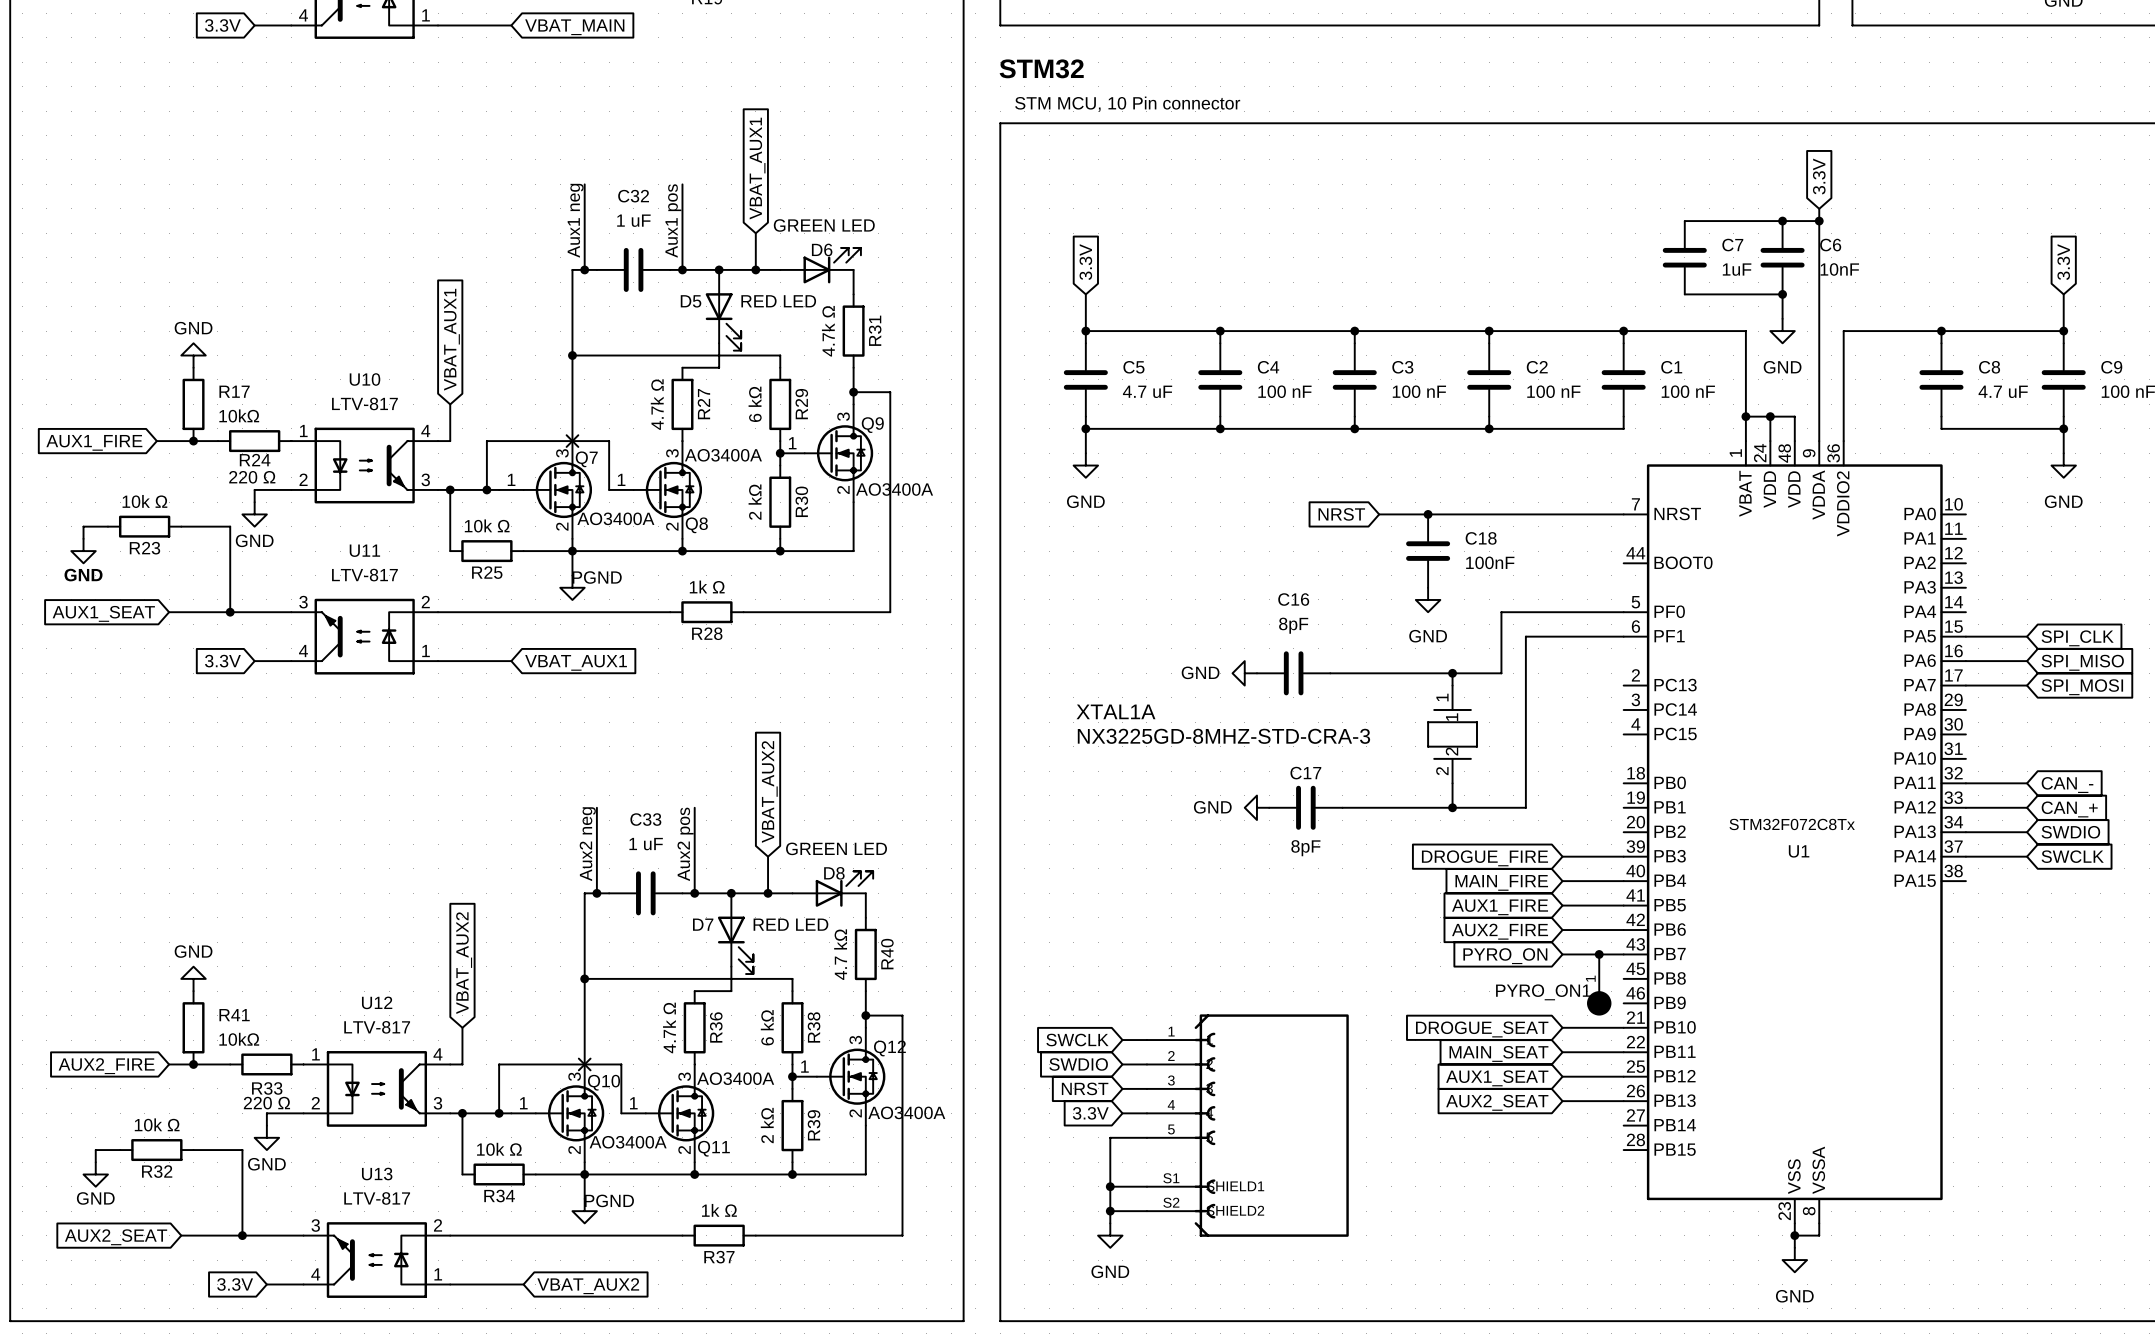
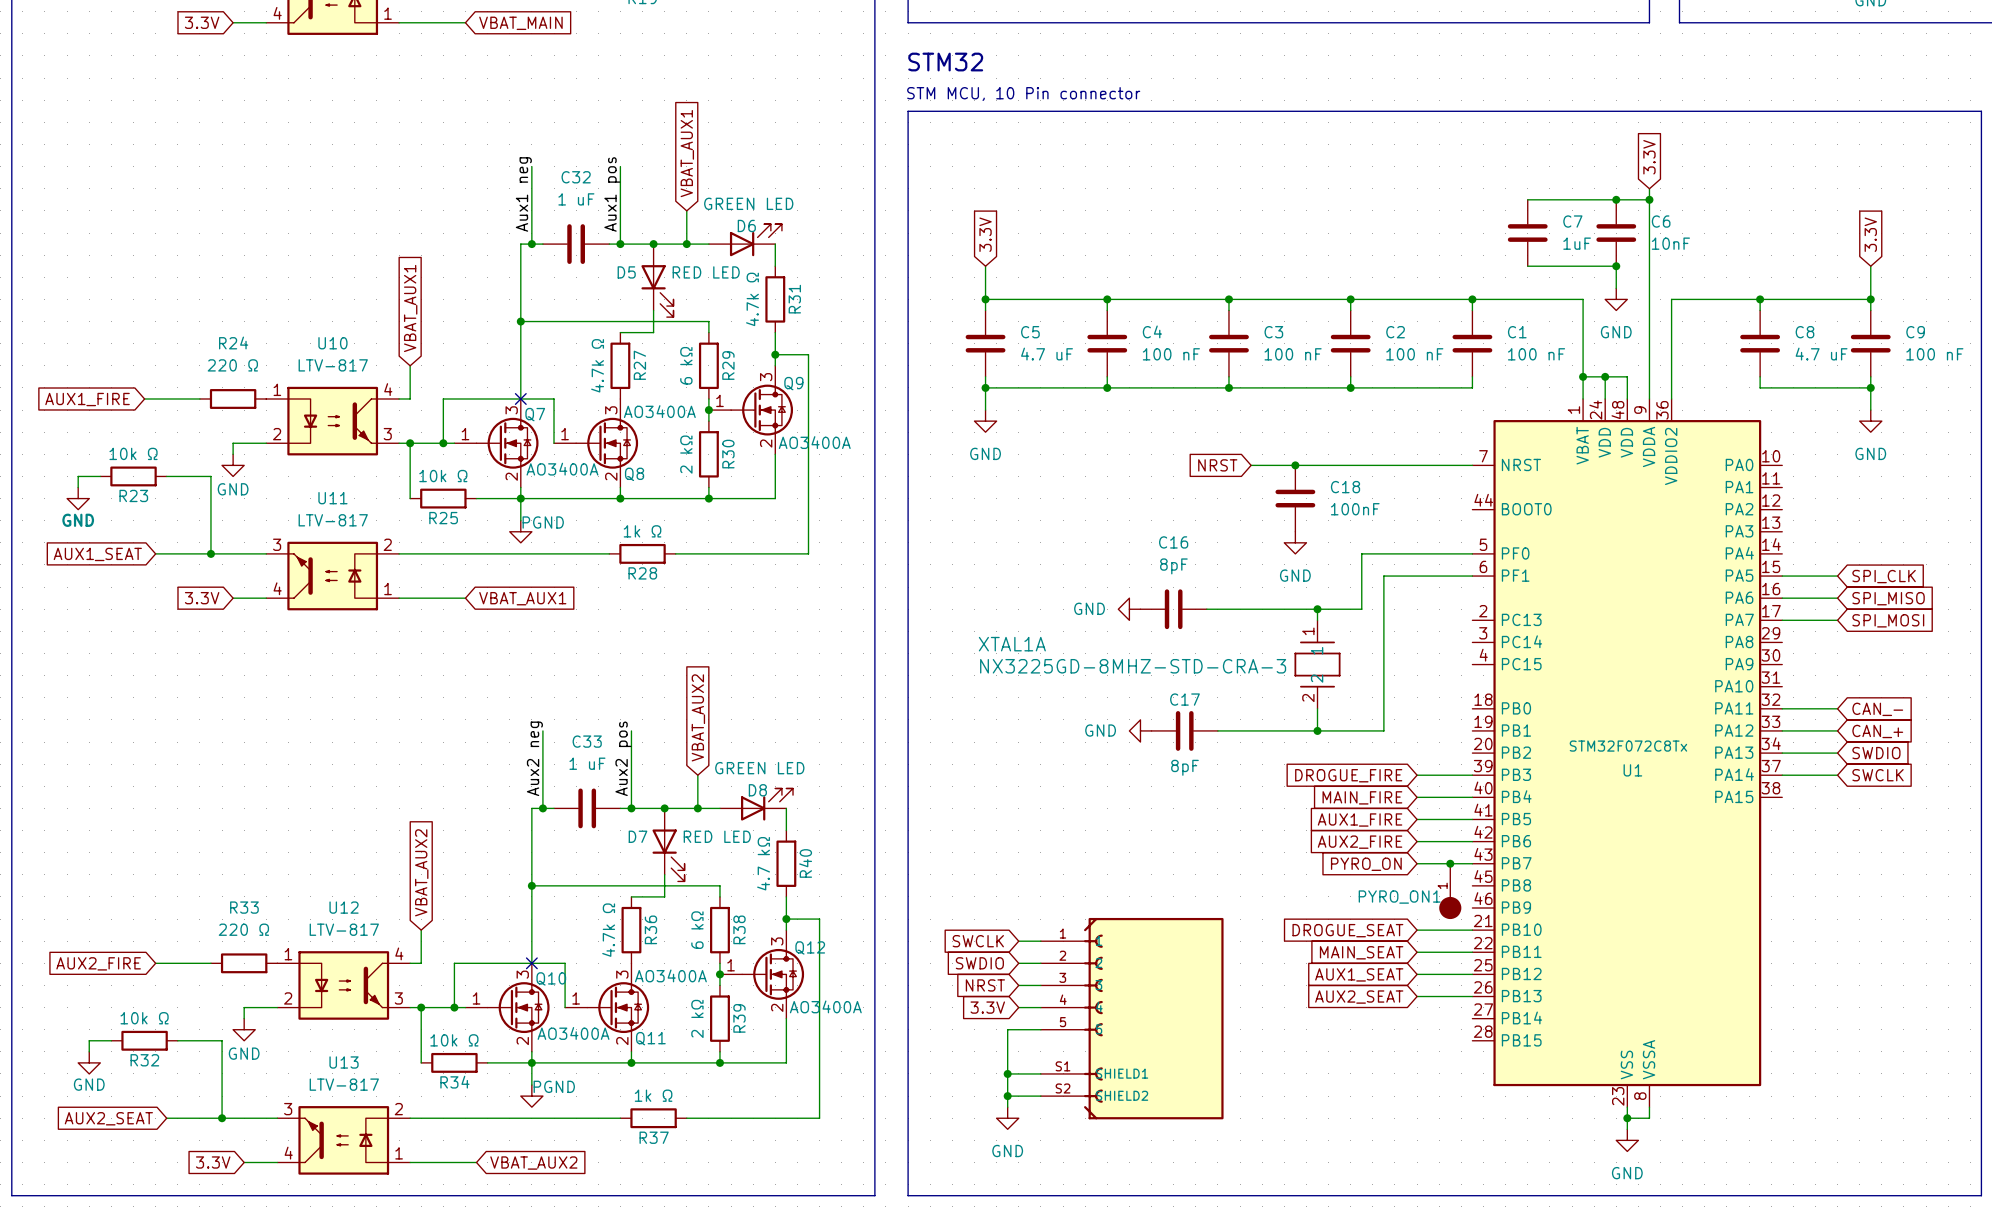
power symbol: GND (193, 355) -> none
R17: 10kΩ (193, 404) -> none
junction: (193, 441) -> none
R24 name position: R24 (255, 460) -> R24 (233, 342)
R24 value position: 220 Ω (252, 477) -> 220 Ω (232, 365)
power symbol: GND (193, 978) -> none
R41: 10kΩ (193, 1027) -> none
junction: (193, 1064) -> none
R33 name position: R33 (267, 1088) -> R33 (244, 907)
R33 value position: 220 Ω (266, 1103) -> 220 Ω (243, 929)

